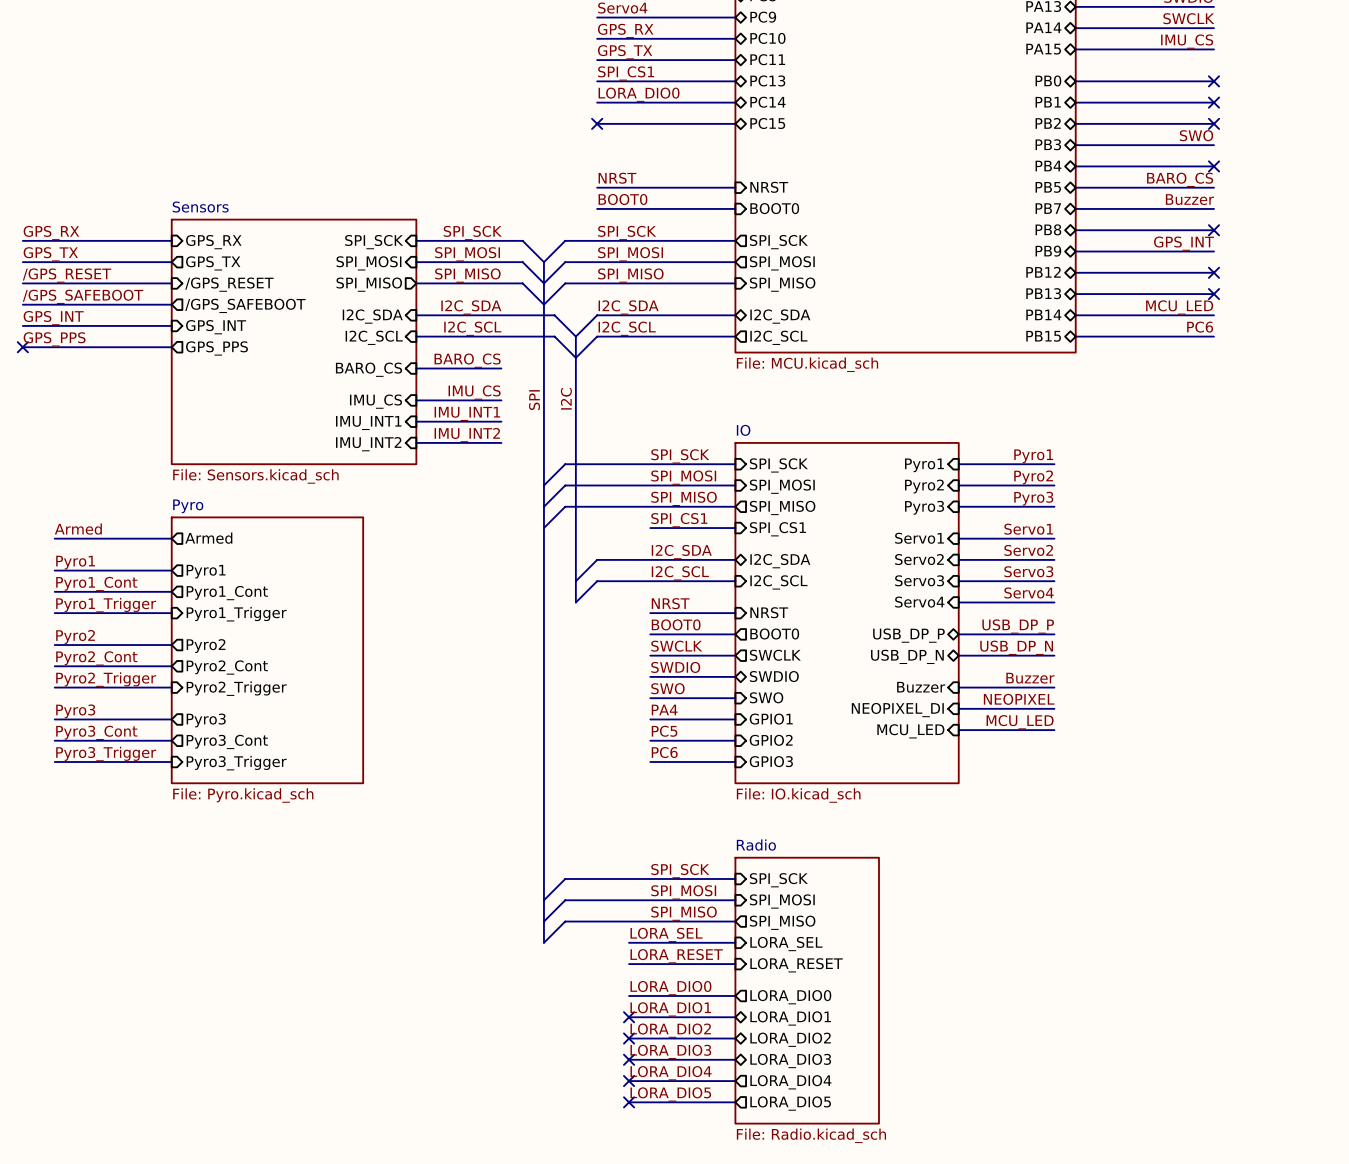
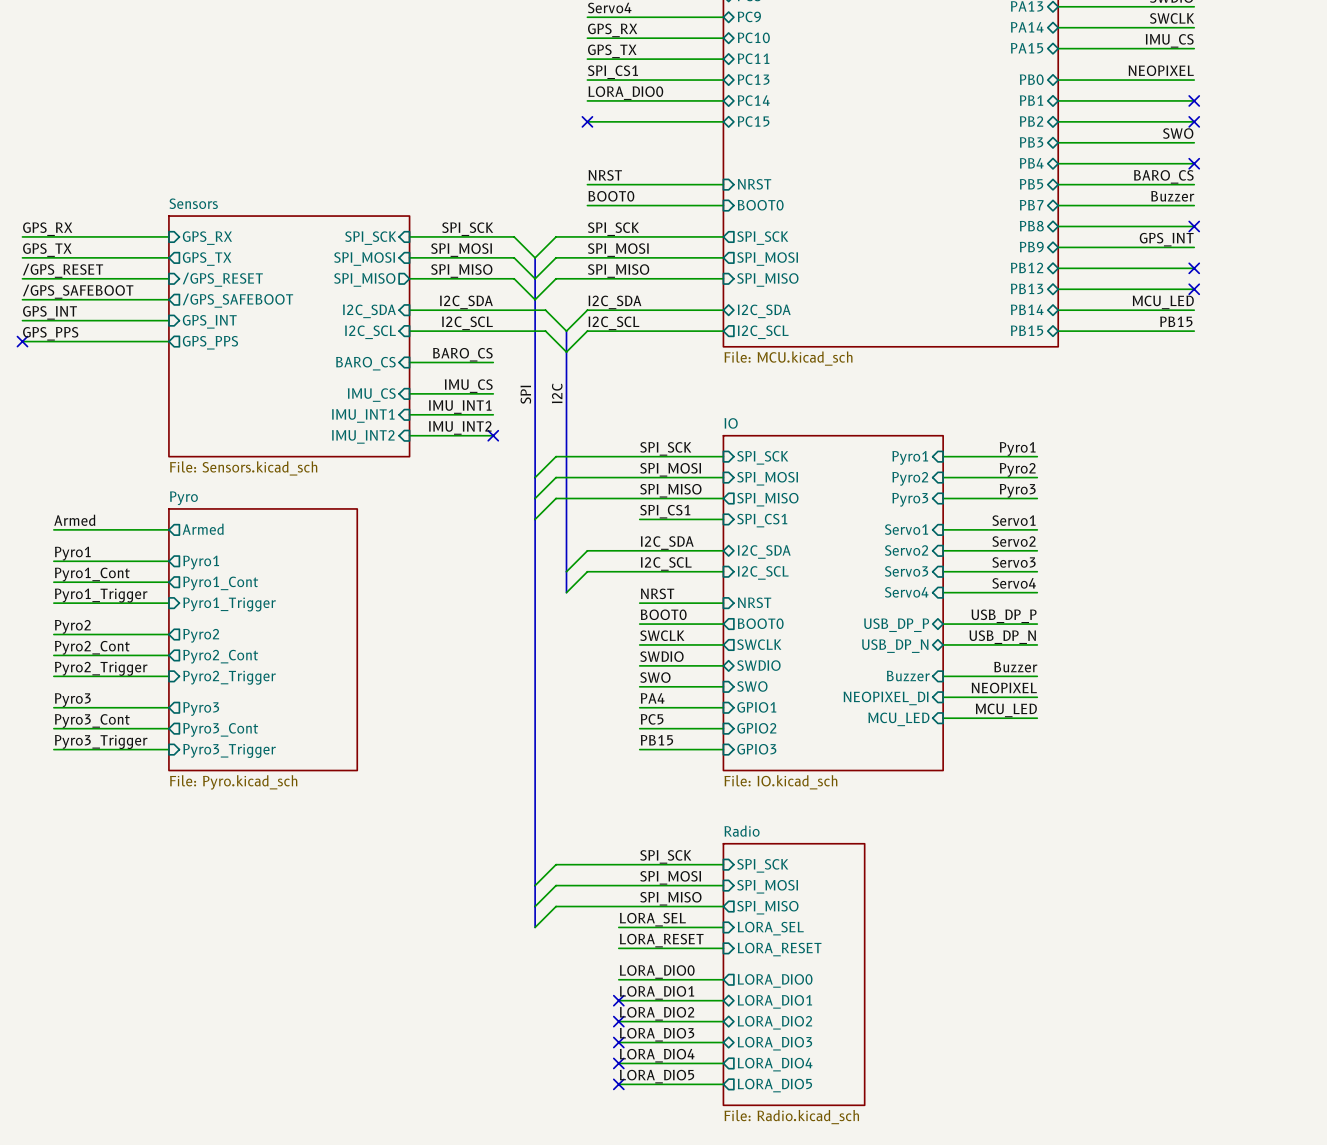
label: none -> NEOPIXEL (1161, 70)
no-connect mark: (1214, 81) -> none
label: PC6 (1200, 327) -> PB15 (1176, 321)
no-connect mark: none -> (493, 435)
label: PC6 (664, 752) -> PB15 (656, 740)

